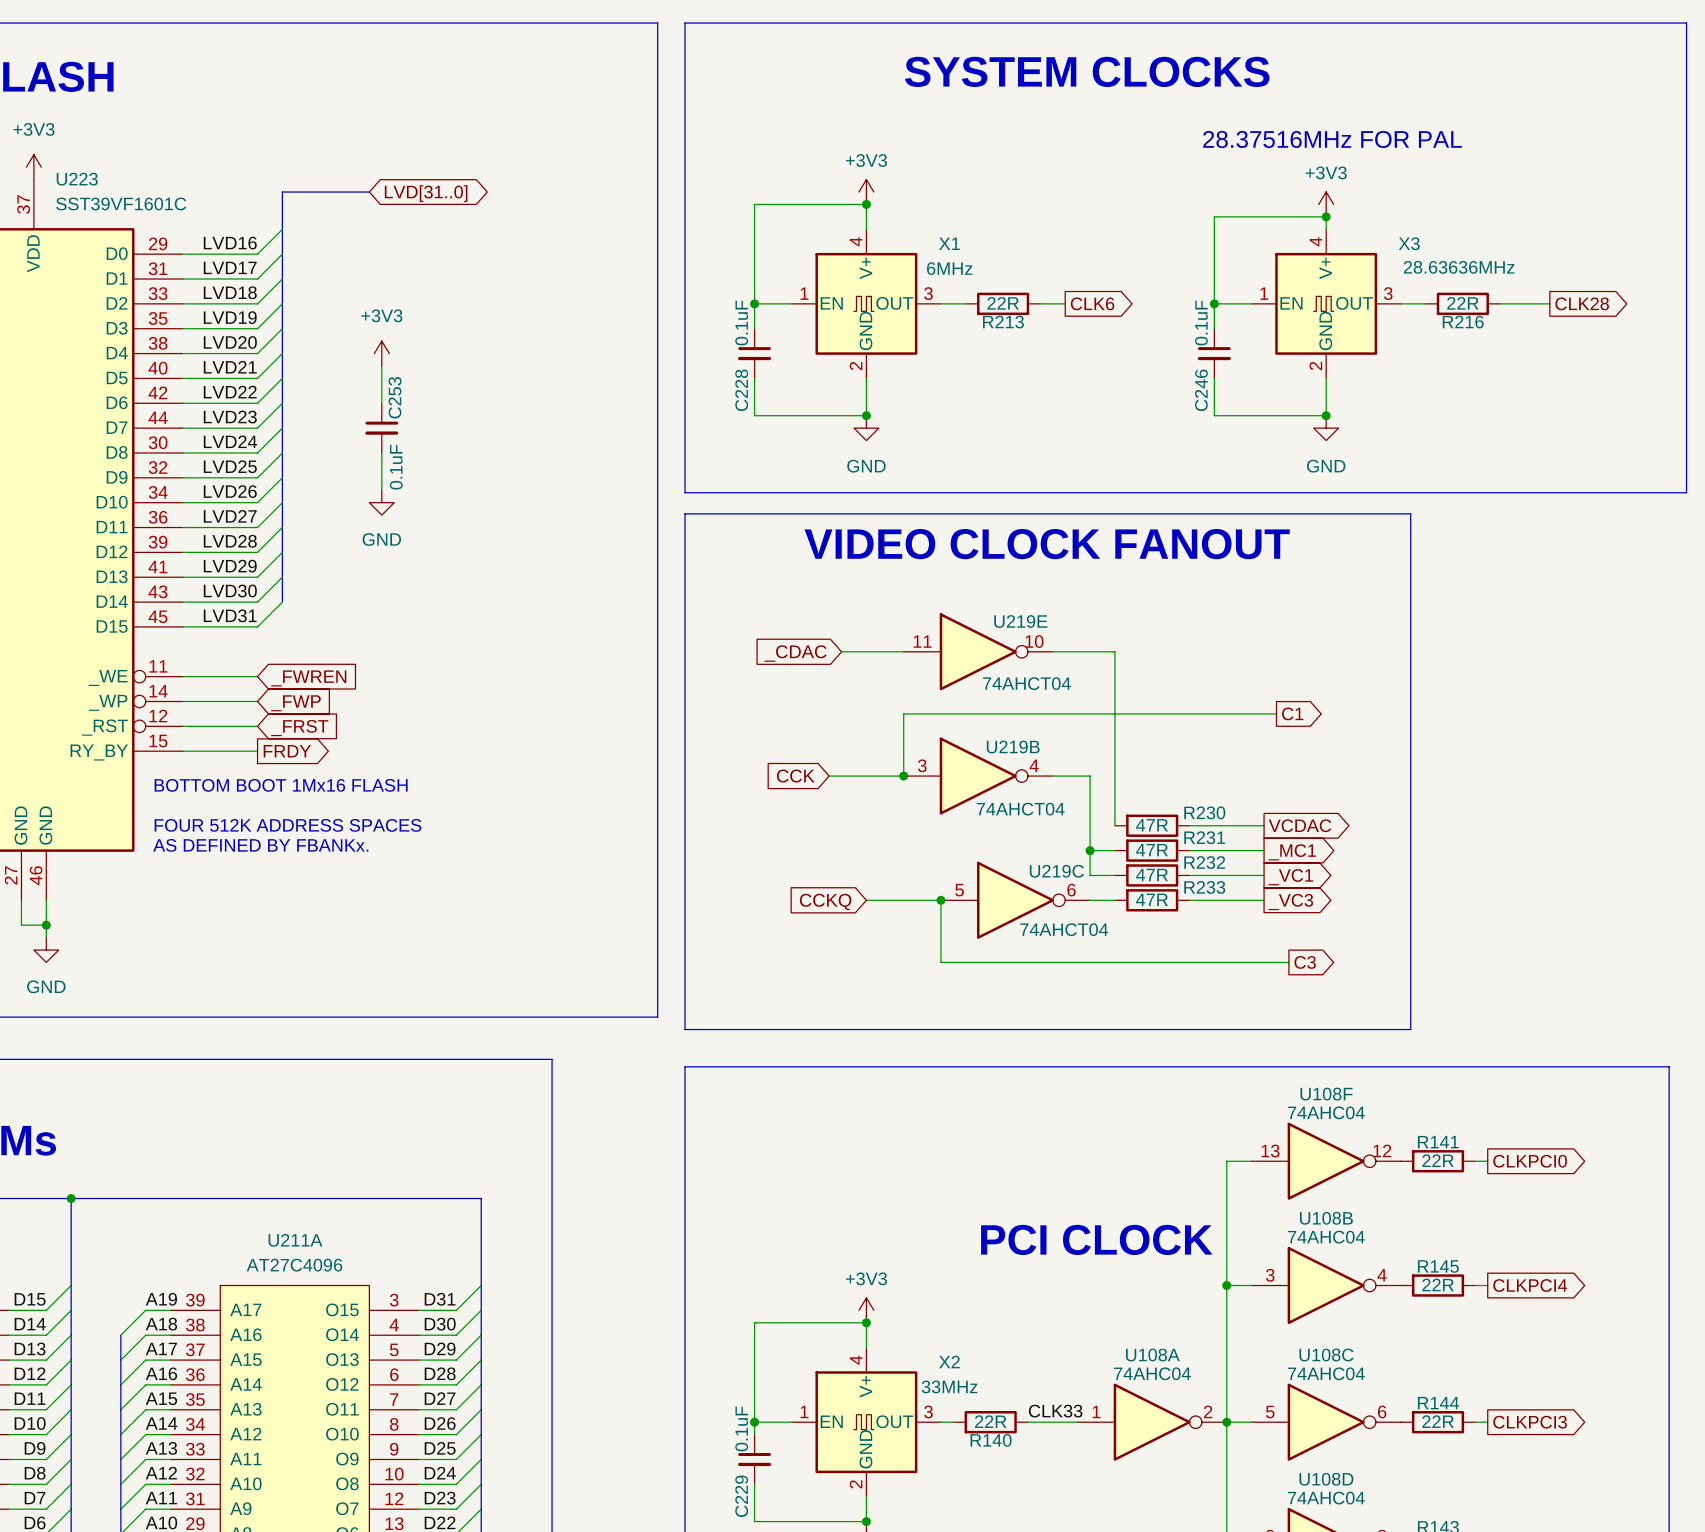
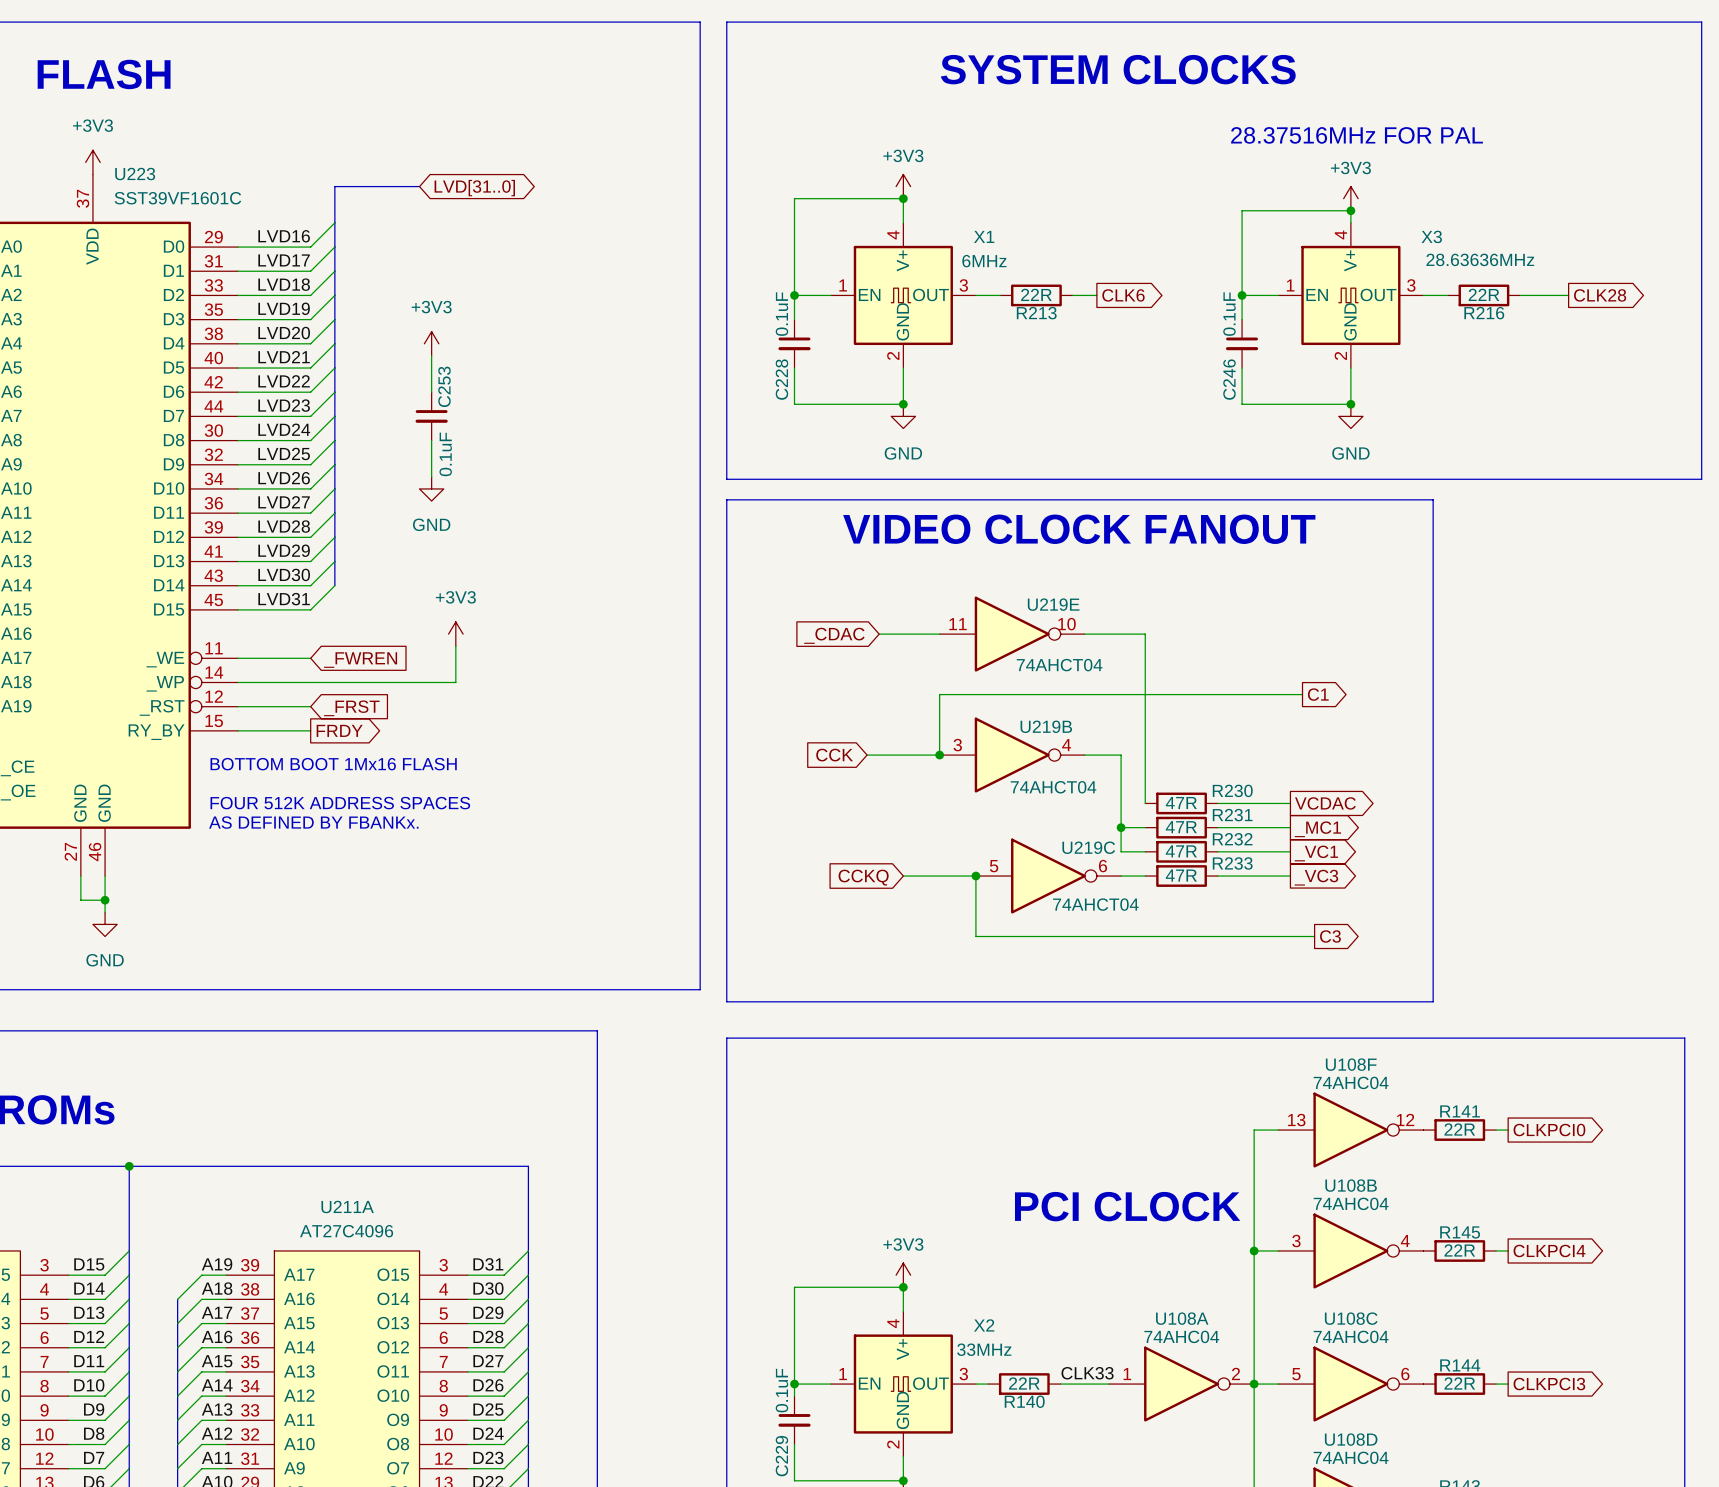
power symbol: none -> +3V3 (455, 634)
wire: none -> (455, 646) (455, 682) (310, 682)
global label: _FWP (296, 703) -> none

